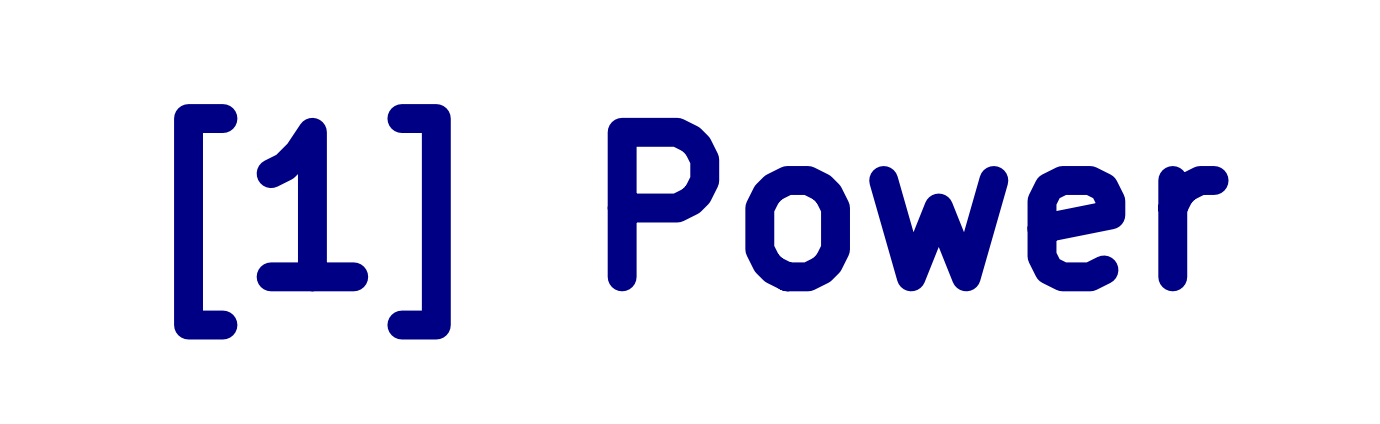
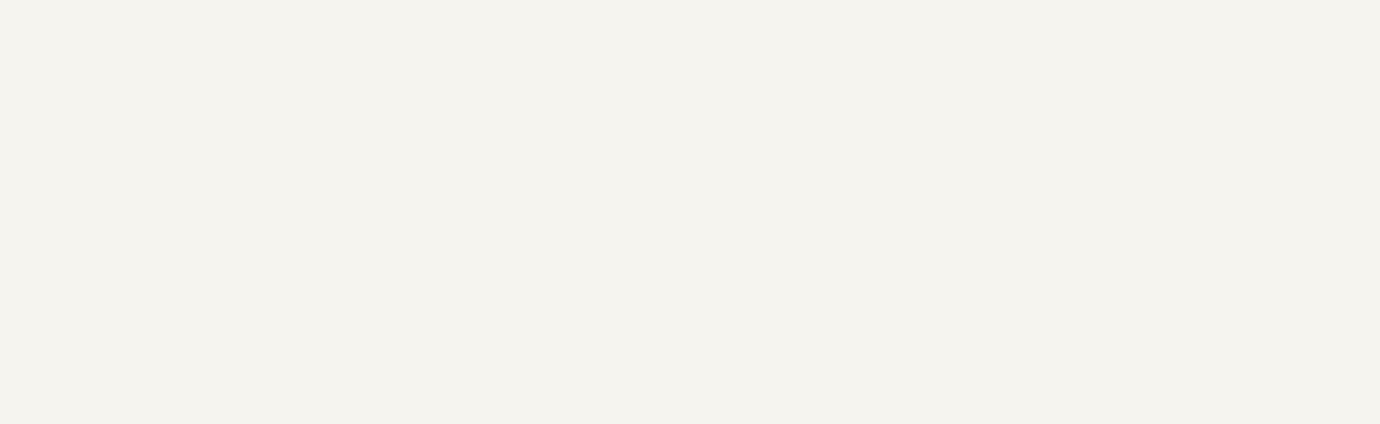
text: [1] Power (701, 221) -> none

